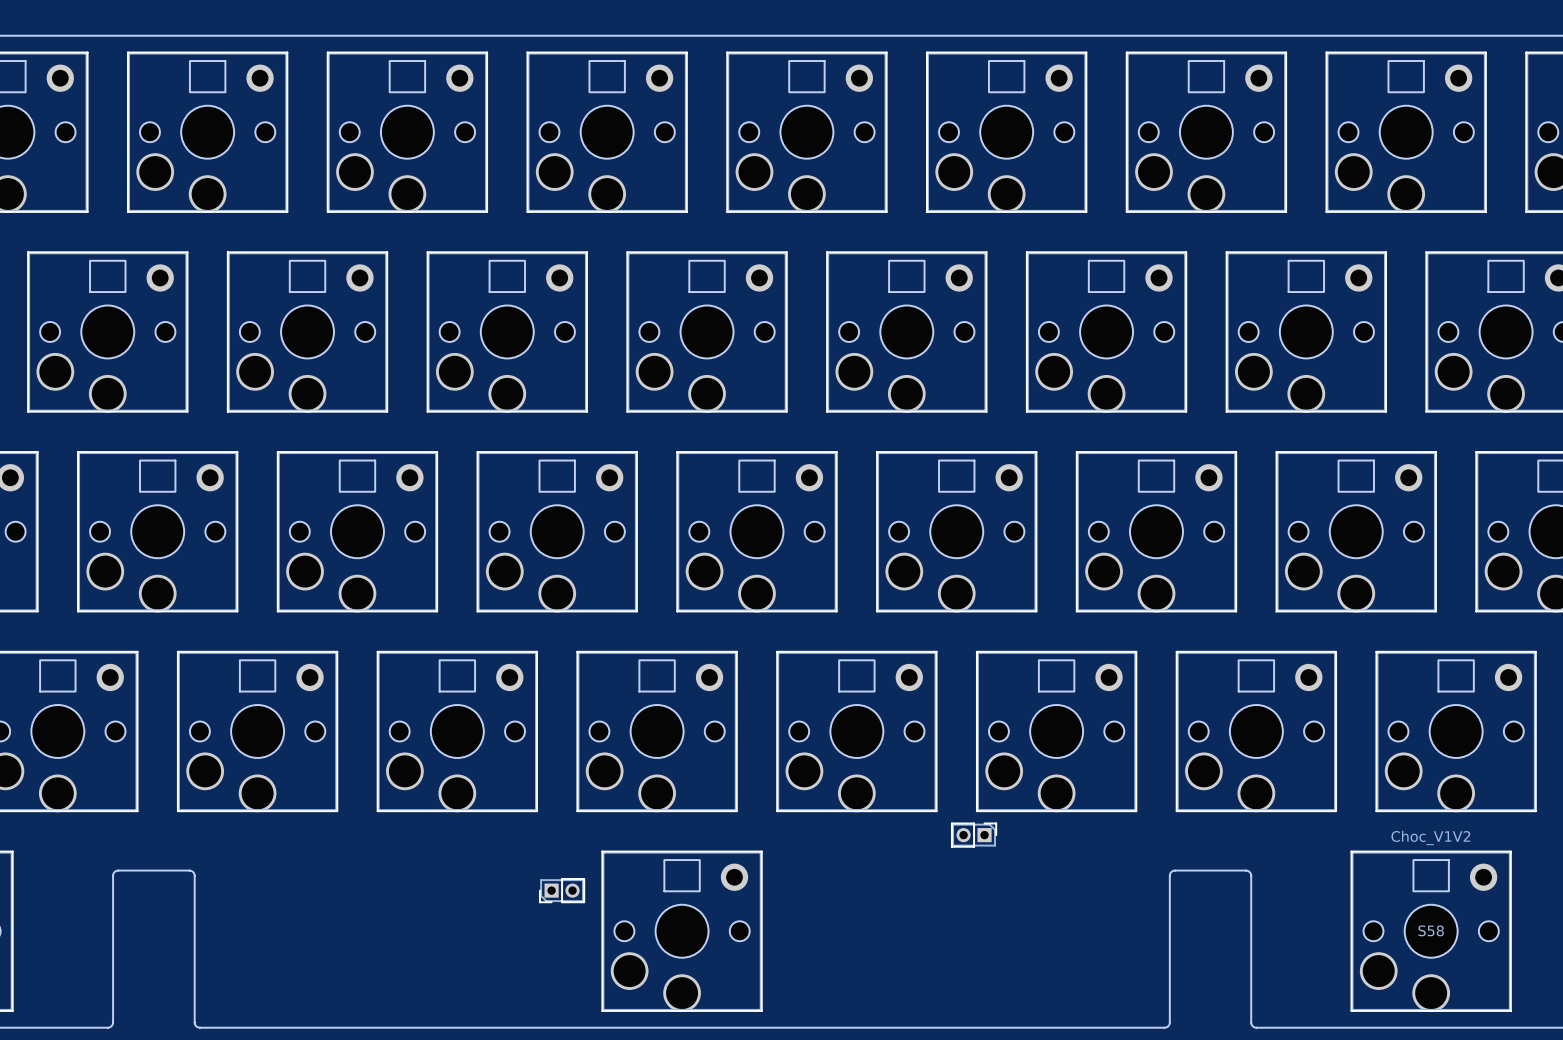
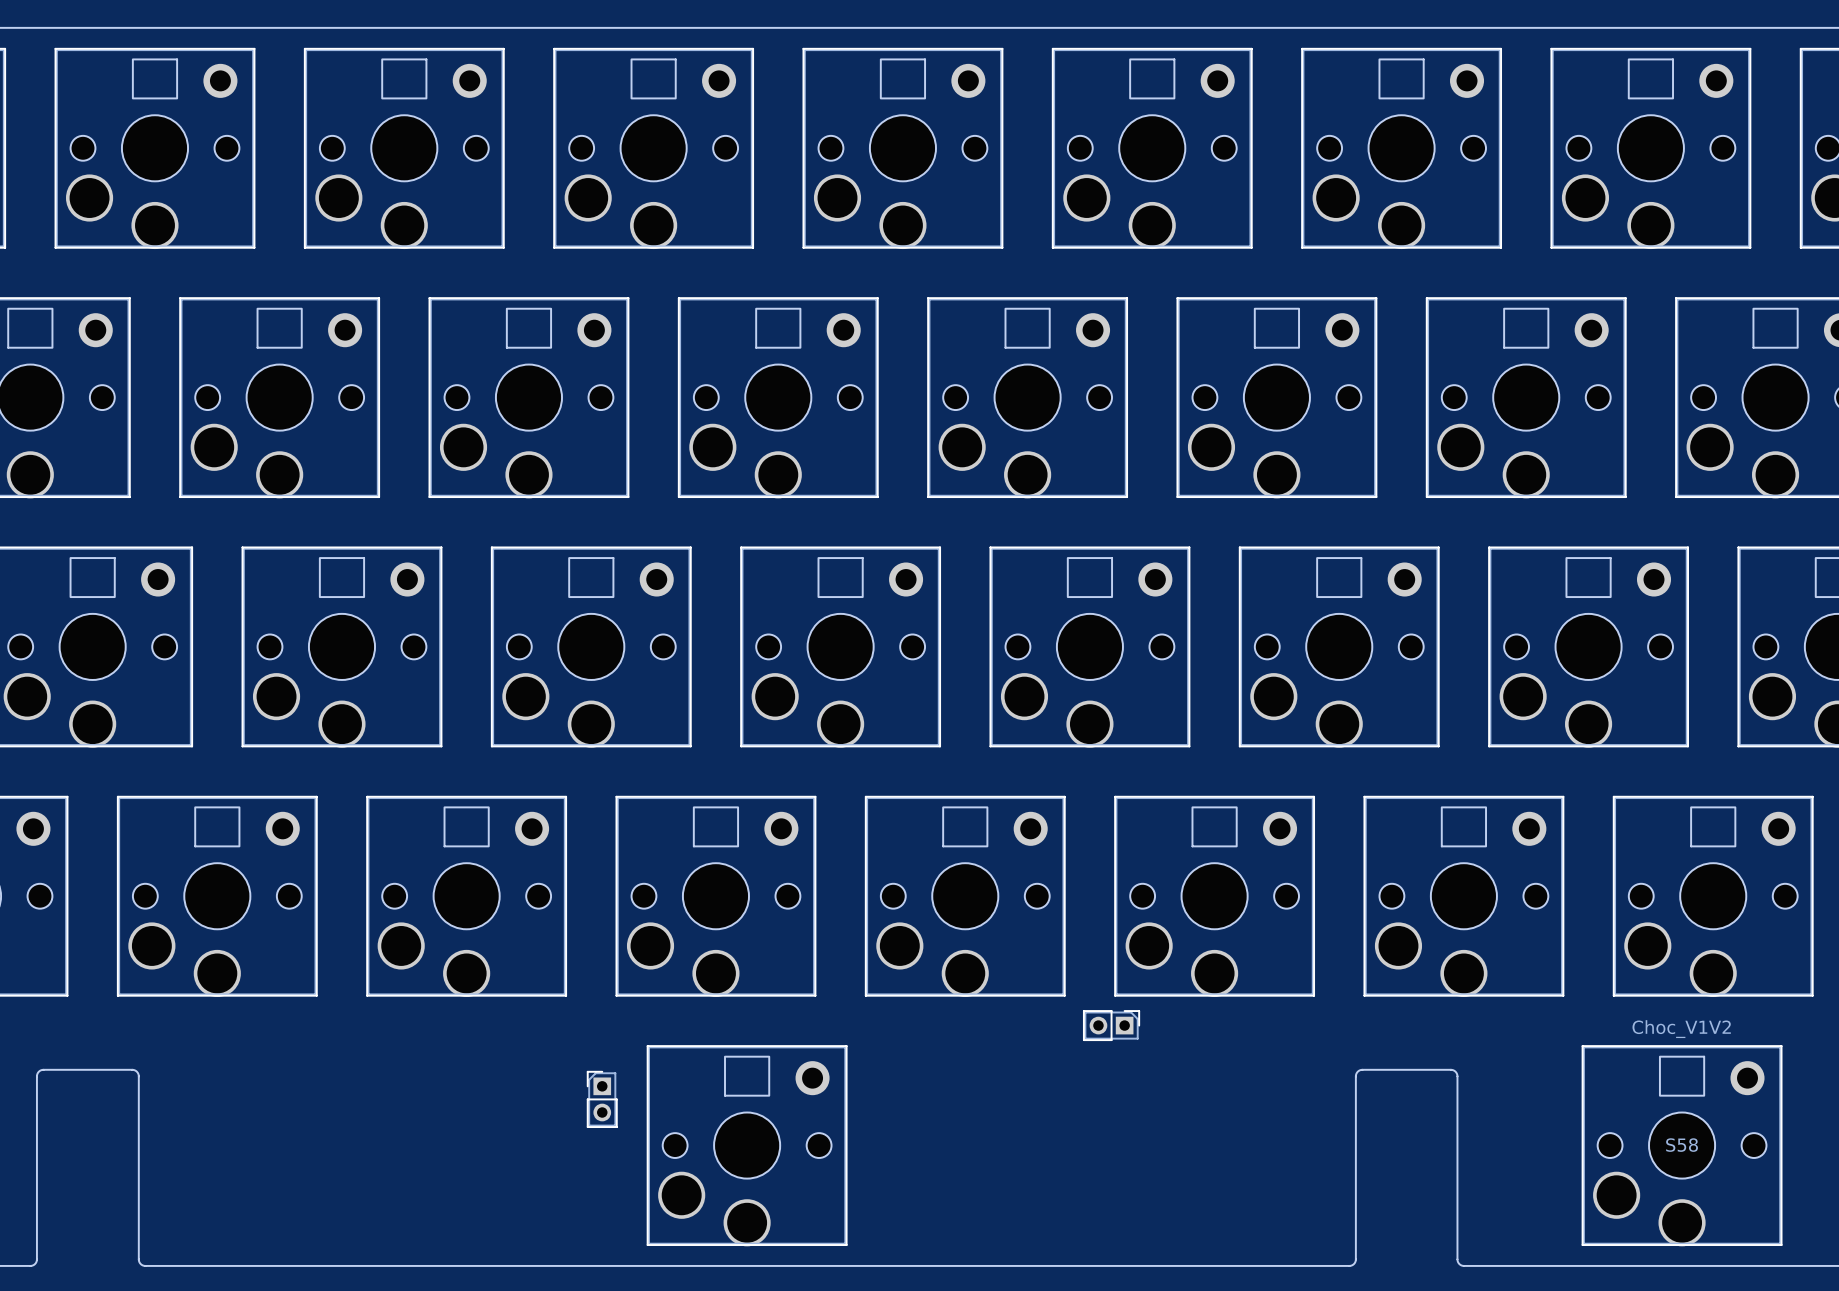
part rotation: 0° (562, 890) -> 90° clockwise (602, 1099)

